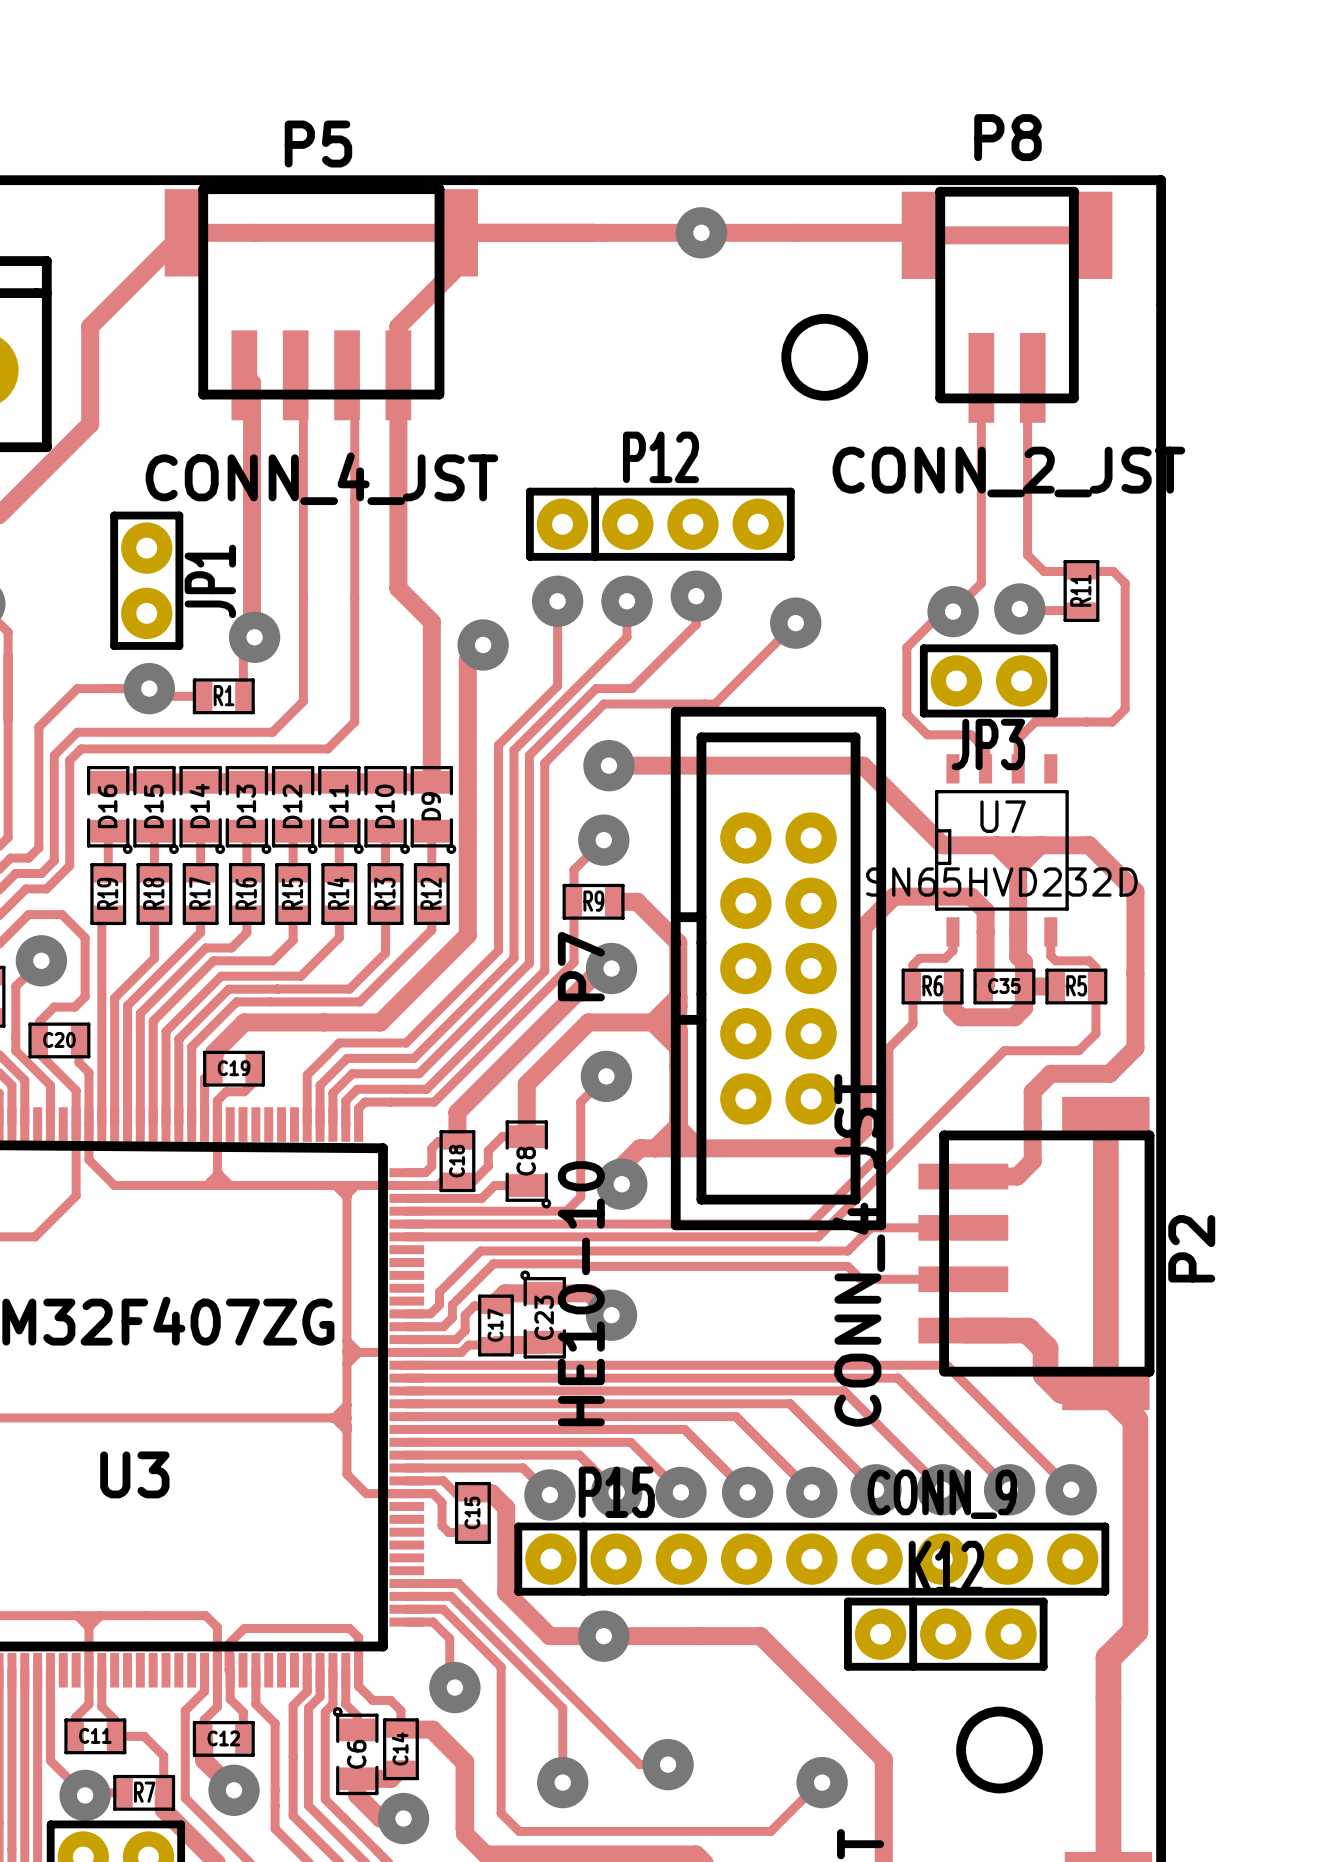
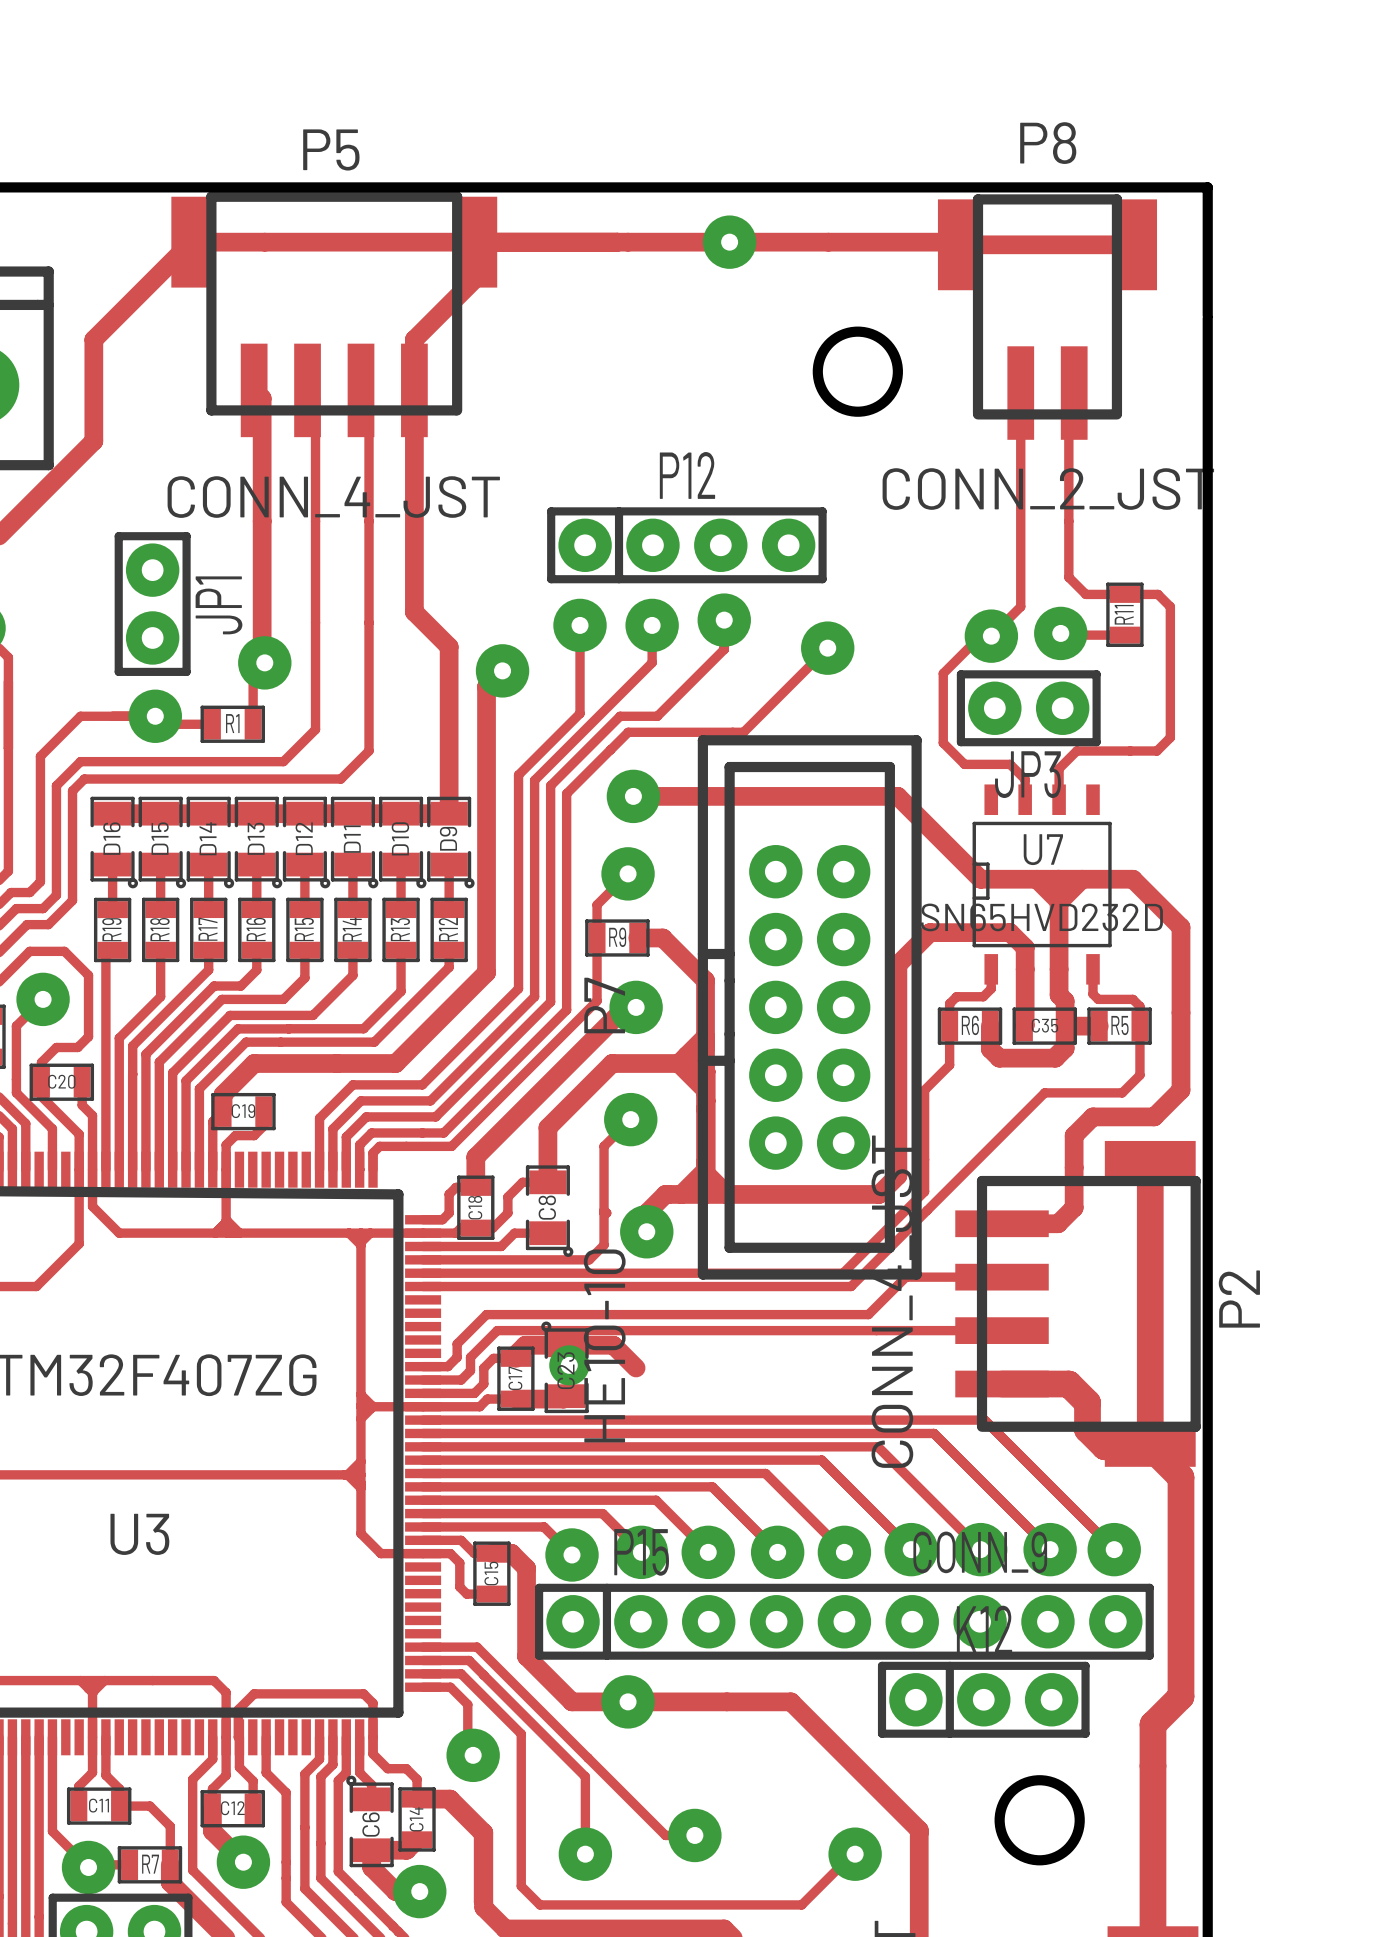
track: (847, 1251) (480, 1251) (467, 1263) -> none
track: (493, 1263) (478, 1279) -> (513, 1314) (486, 1314)
track: (583, 1263) (585, 1266) (847, 1266) (860, 1279) -> (606, 1314) (868, 1314) (881, 1301)
track: none -> (497, 1330) (895, 1330)
via: none -> (569, 1365)
via: (611, 1315) -> none

